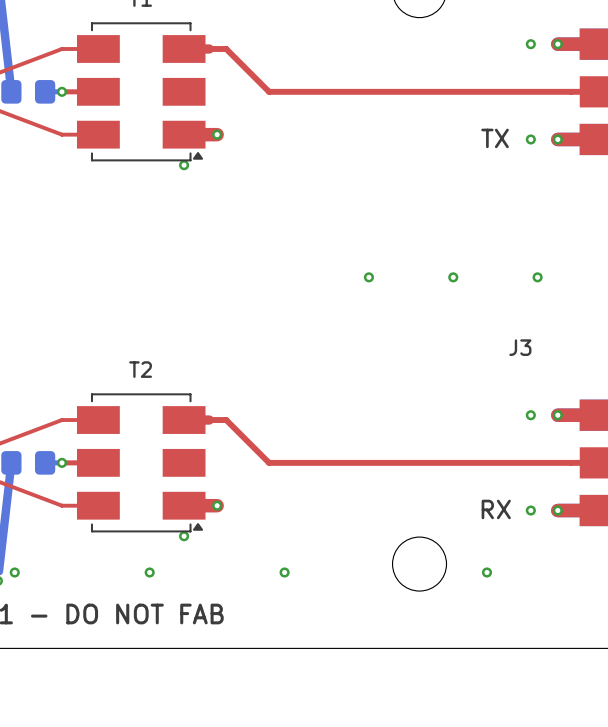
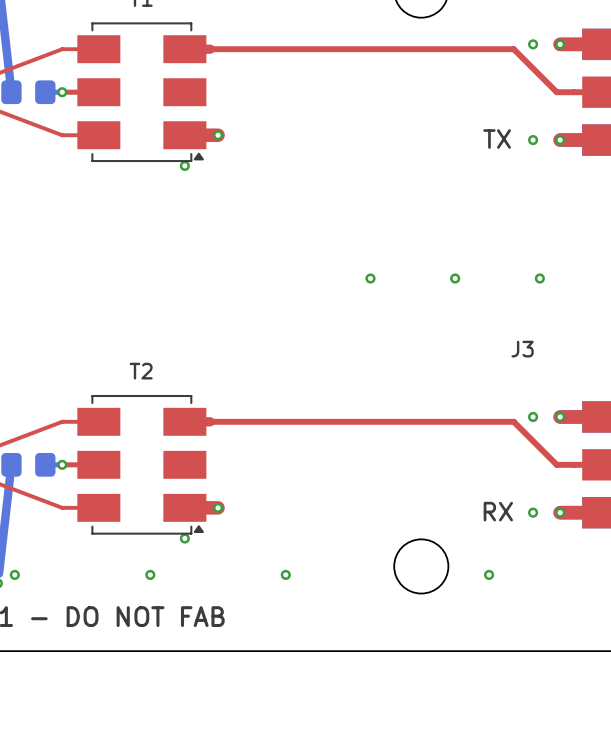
top track: (226, 48) (269, 91) (554, 91) -> (227, 49) (513, 49) (556, 92)
top track: (226, 420) (269, 462) (554, 462) -> (227, 421) (513, 421) (556, 464)

